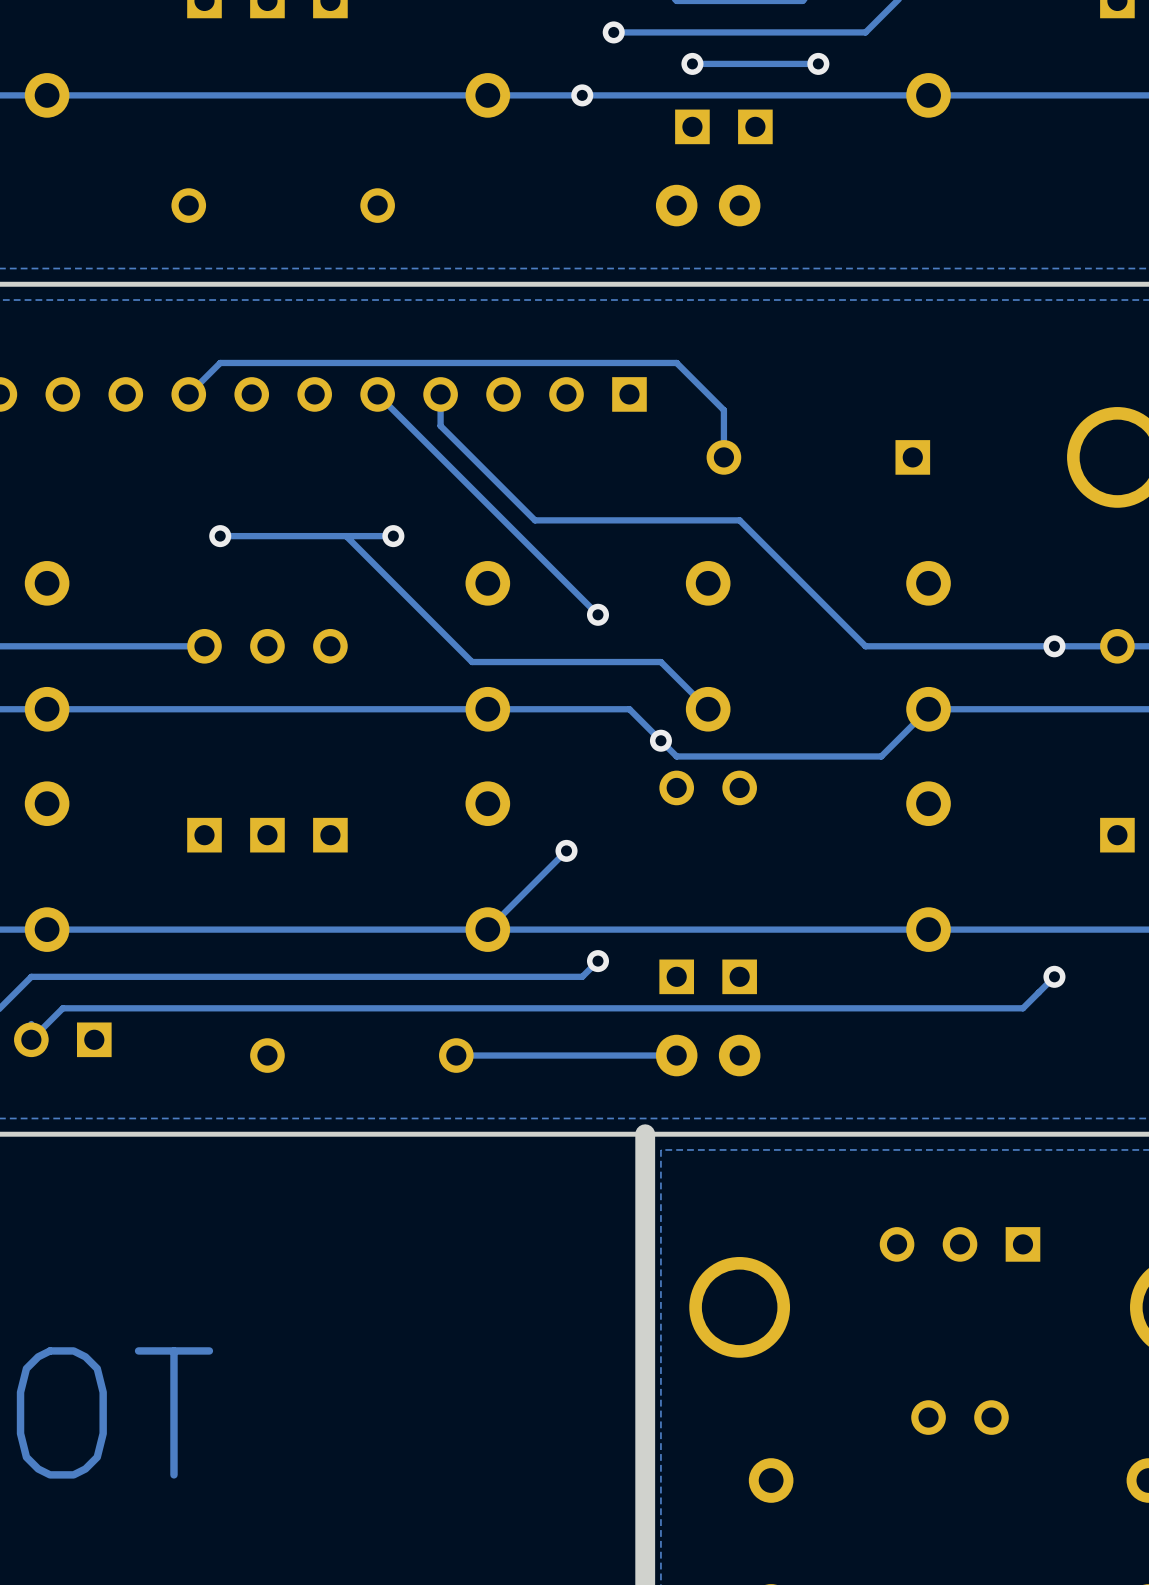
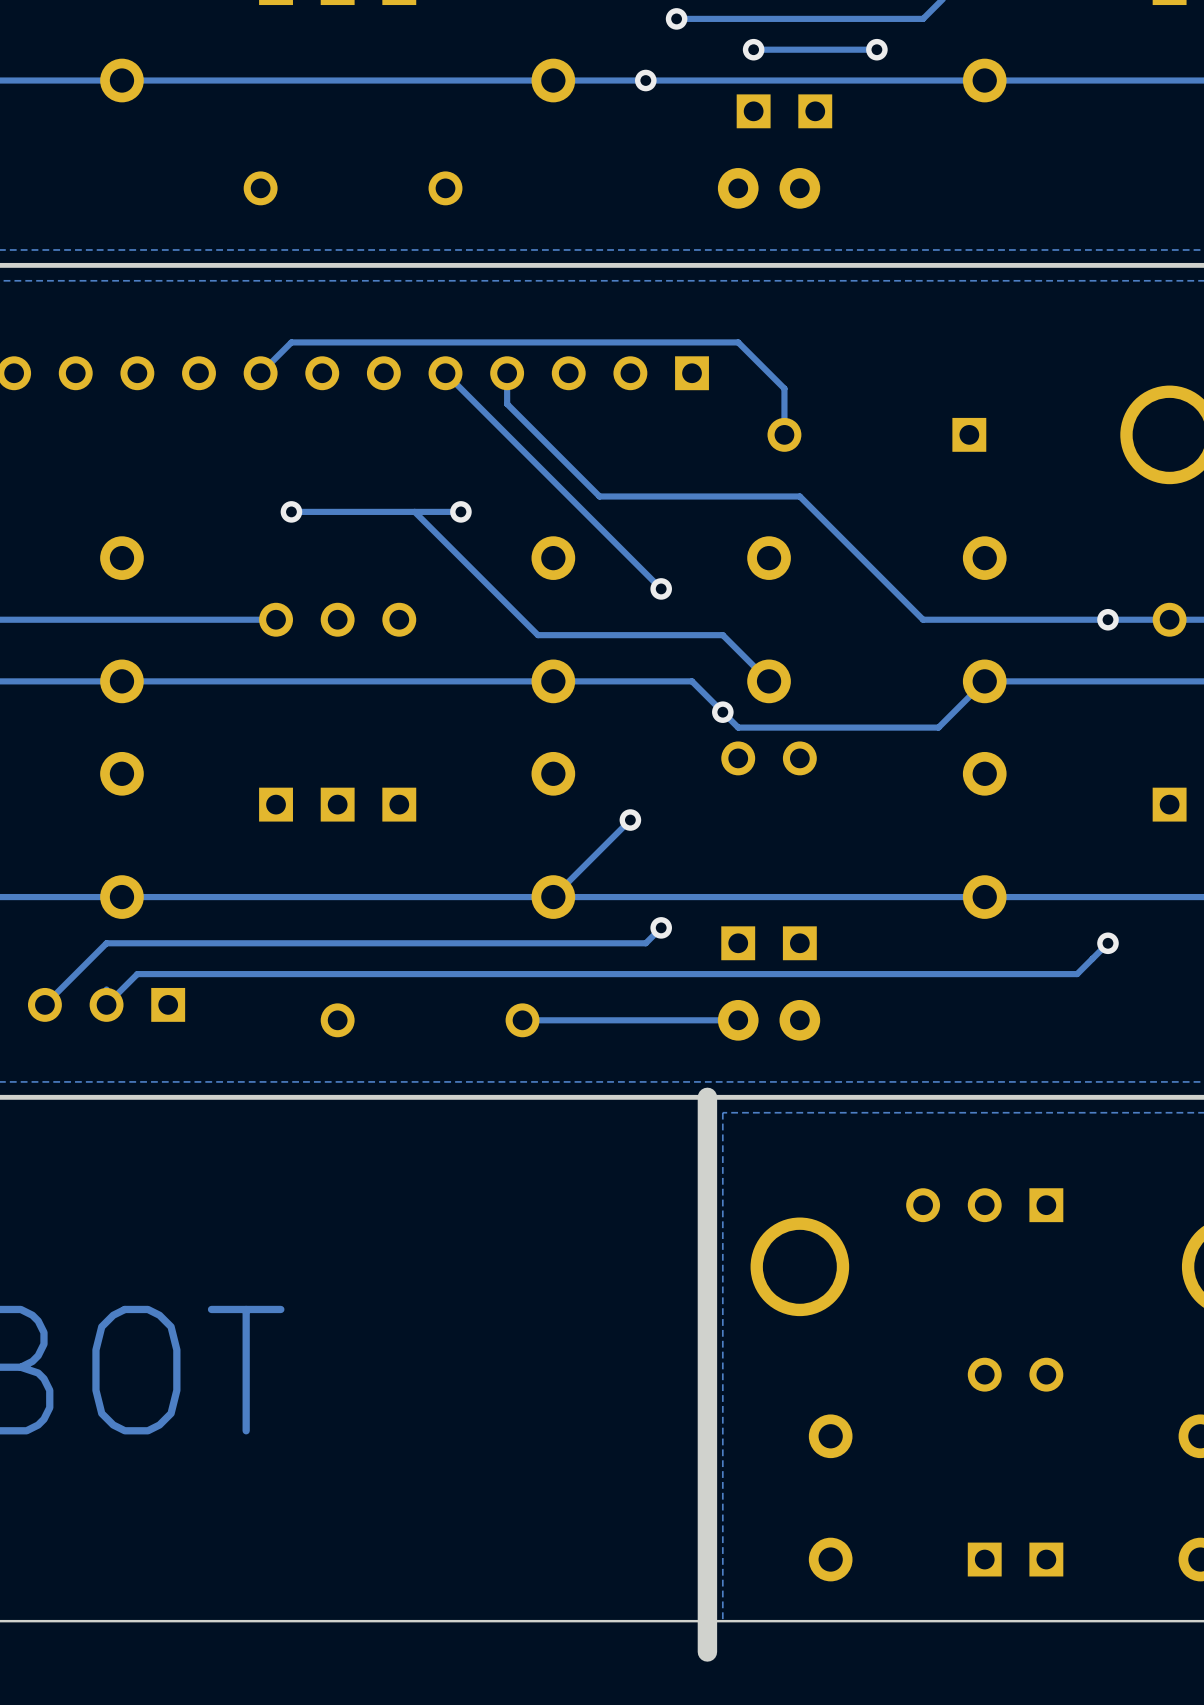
part position: (960, 1244) -> (984, 1205)

